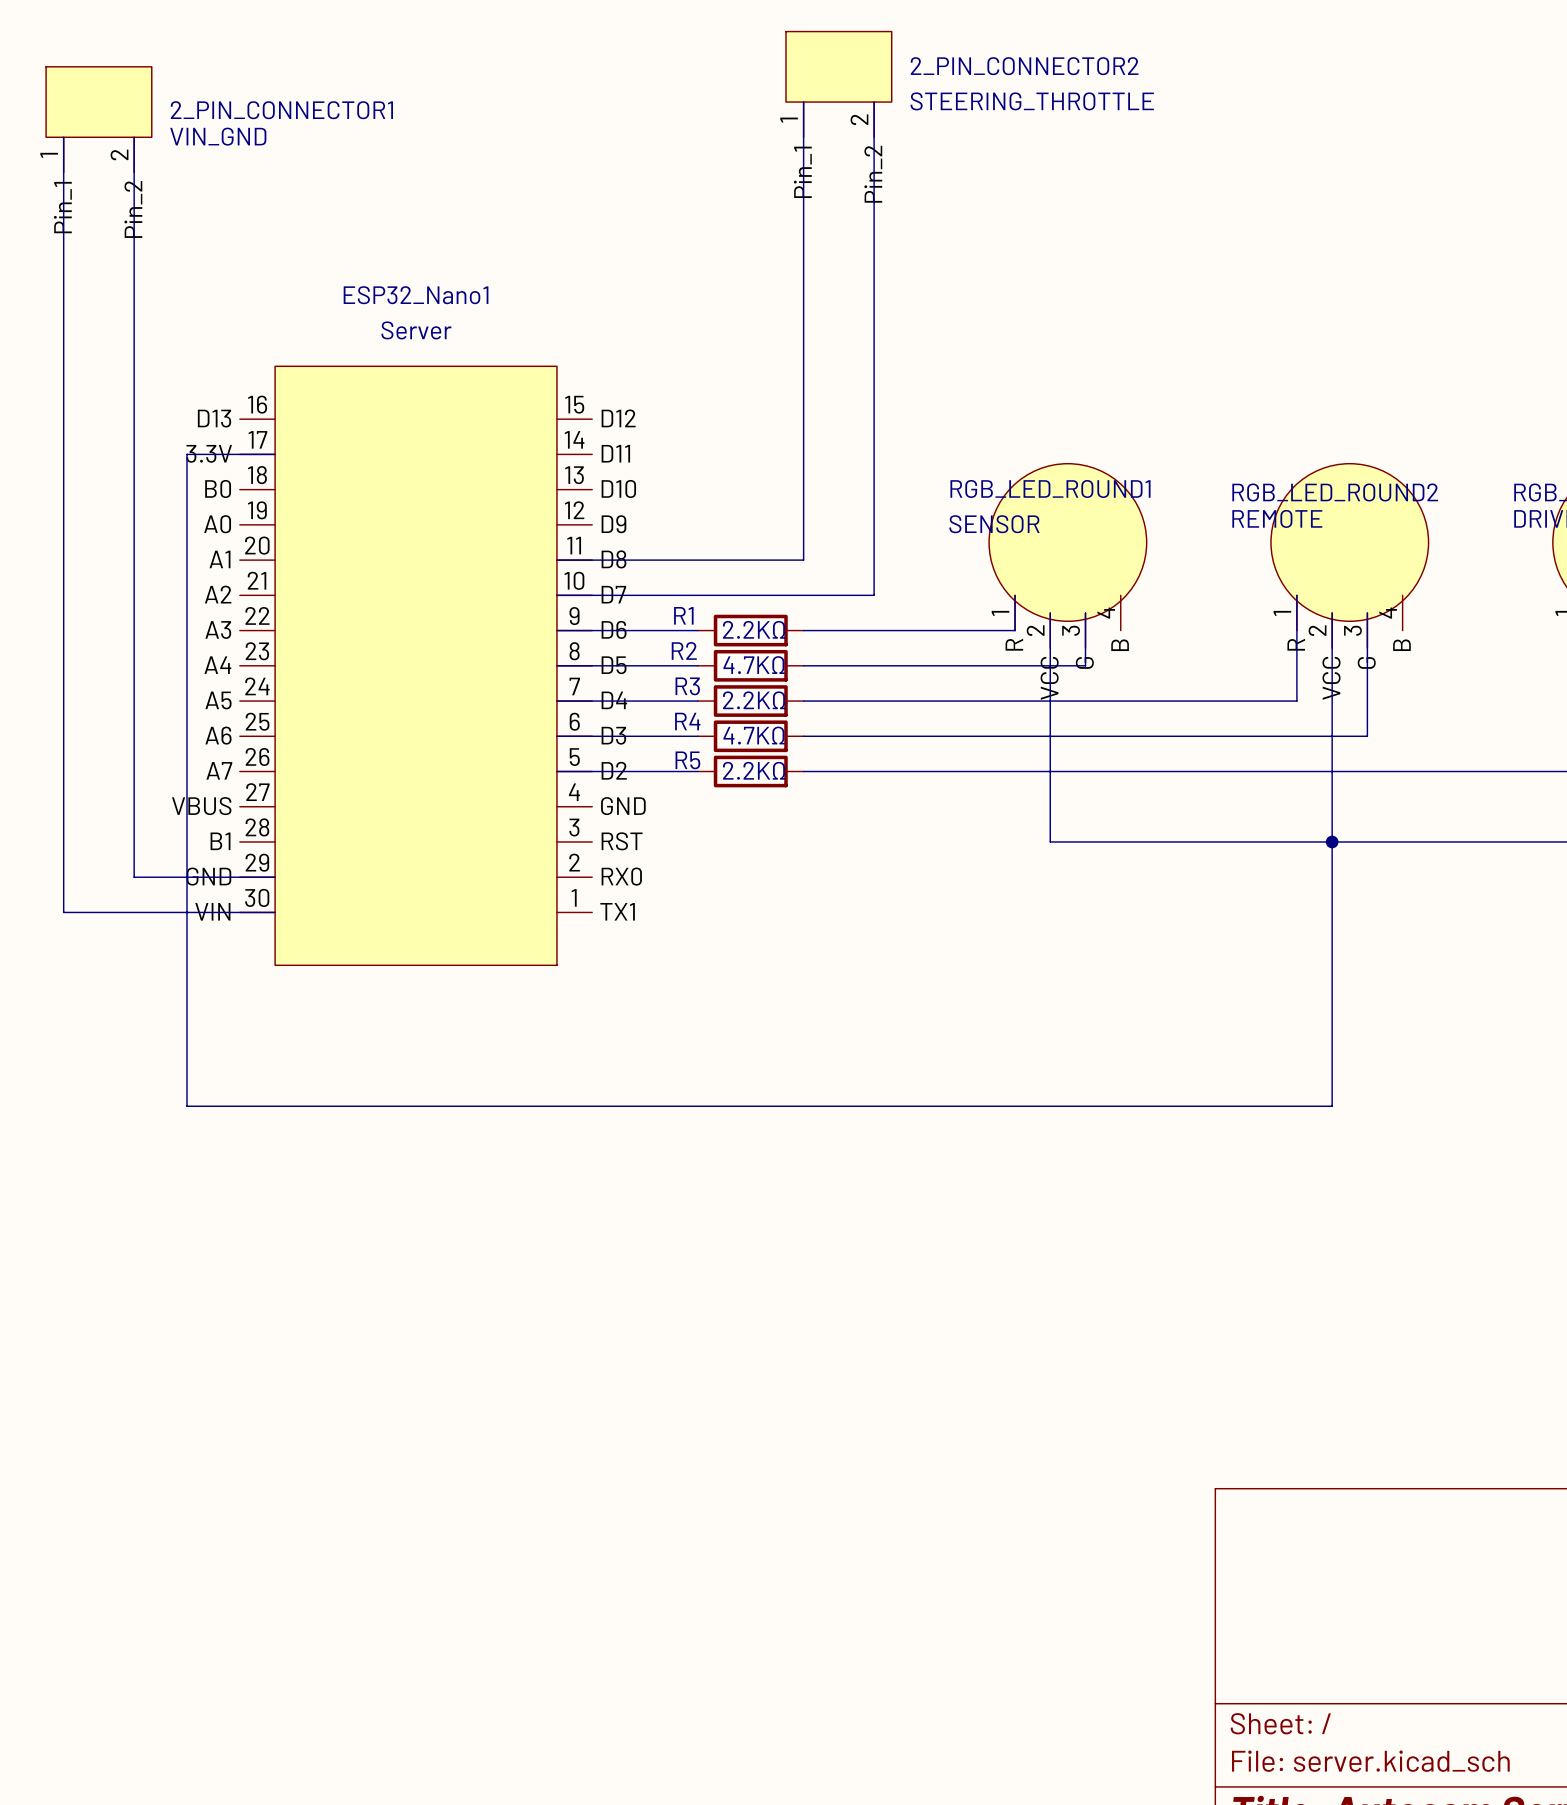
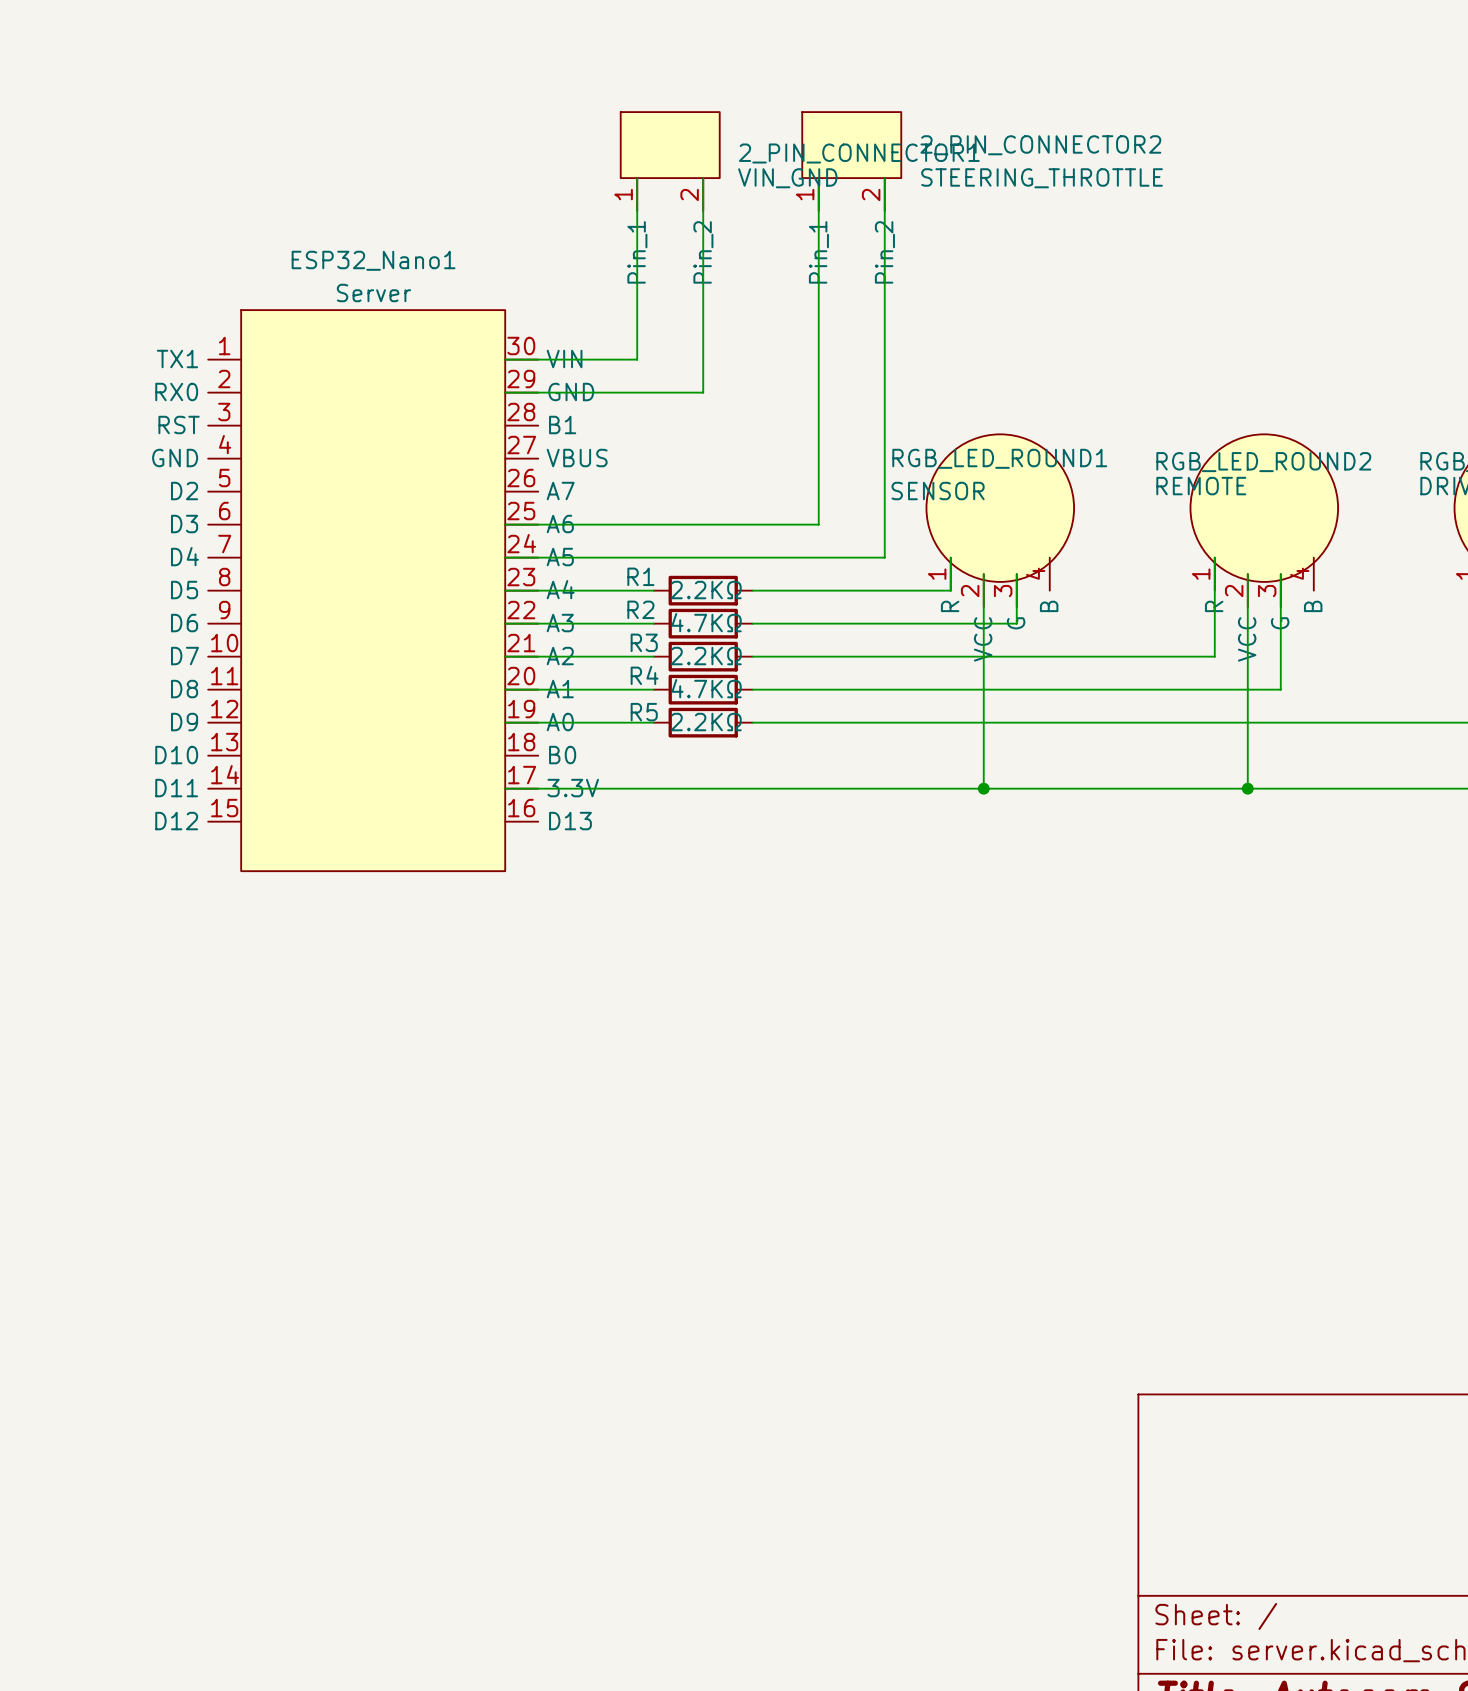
2_PIN_CONNECTOR2 position: (838, 84) -> (851, 161)
wire: (803, 102) (803, 560) -> none
2_PIN_CONNECTOR1 position: (98, 119) -> (670, 161)
wire: (63, 137) (63, 912) (275, 912) -> none
wire: (134, 137) (134, 877) (275, 877) -> none
wire: none -> (637, 178) (637, 359) (505, 359)
wire: none -> (703, 178) (703, 392) (505, 392)
wire: none -> (884, 178) (884, 557) (818, 557)
wire: (275, 454) (187, 454) (187, 1106) (1332, 1106) (1332, 841) -> none
wire: (874, 560) (874, 595) -> (818, 524) (752, 524)
ESP32_Nano1 rotation: 0° (416, 665) -> 180° (373, 590)
wire: none -> (505, 788) (983, 788)
junction: none -> (983, 788)

